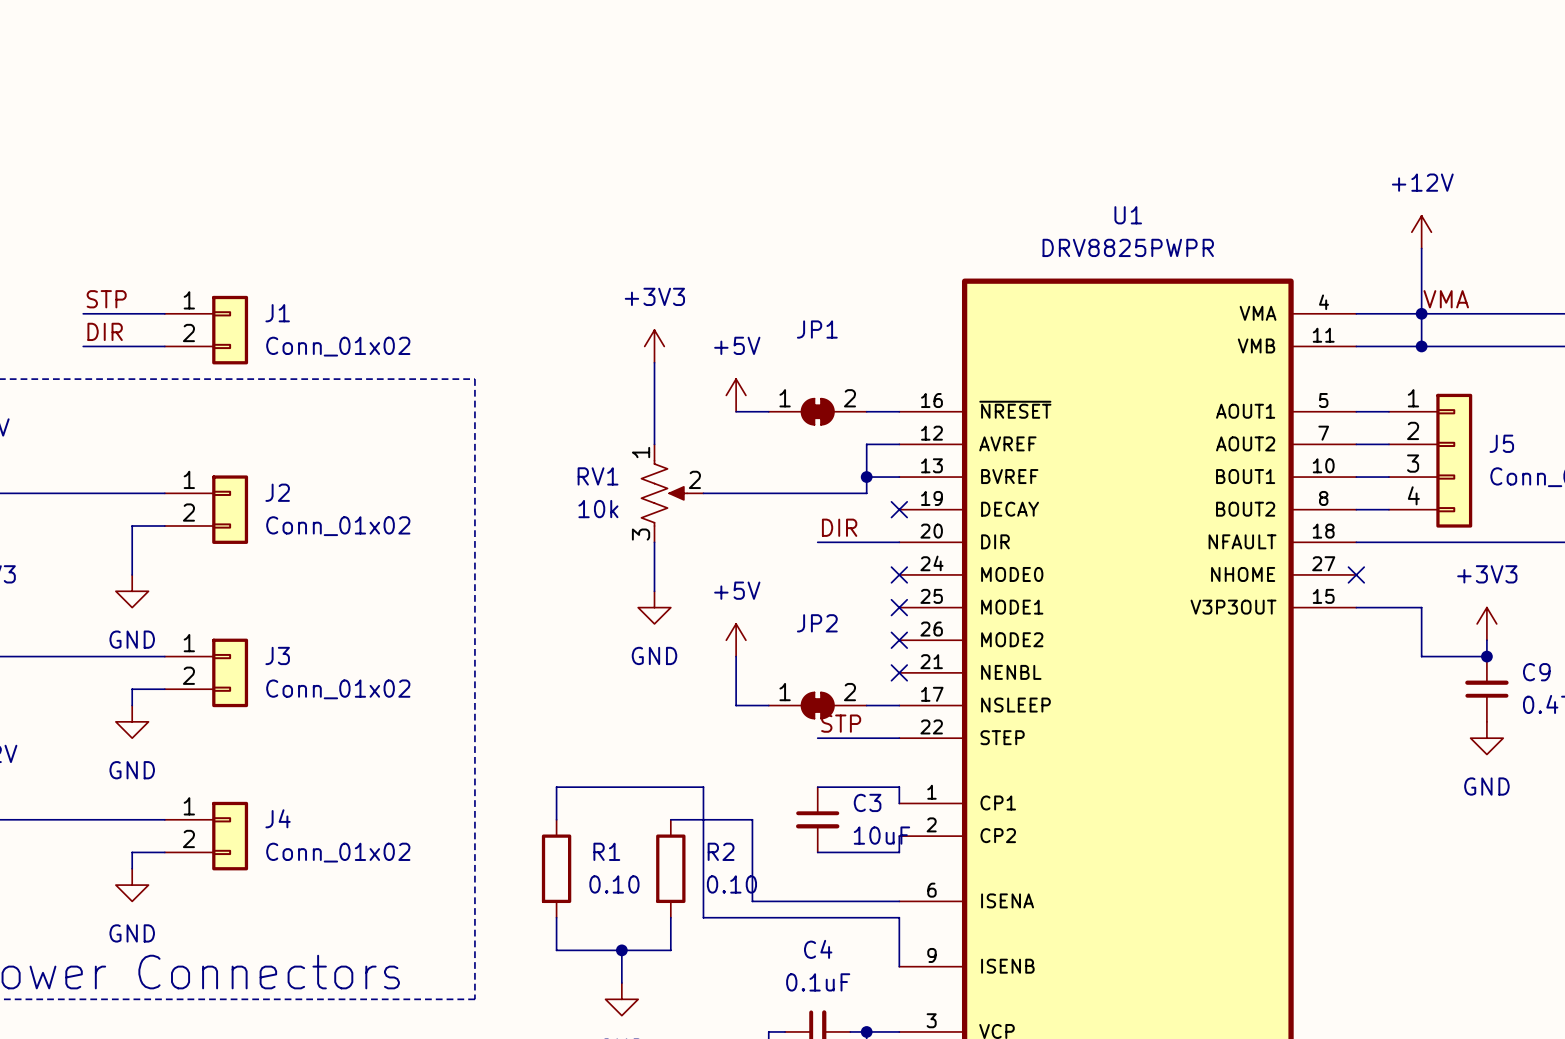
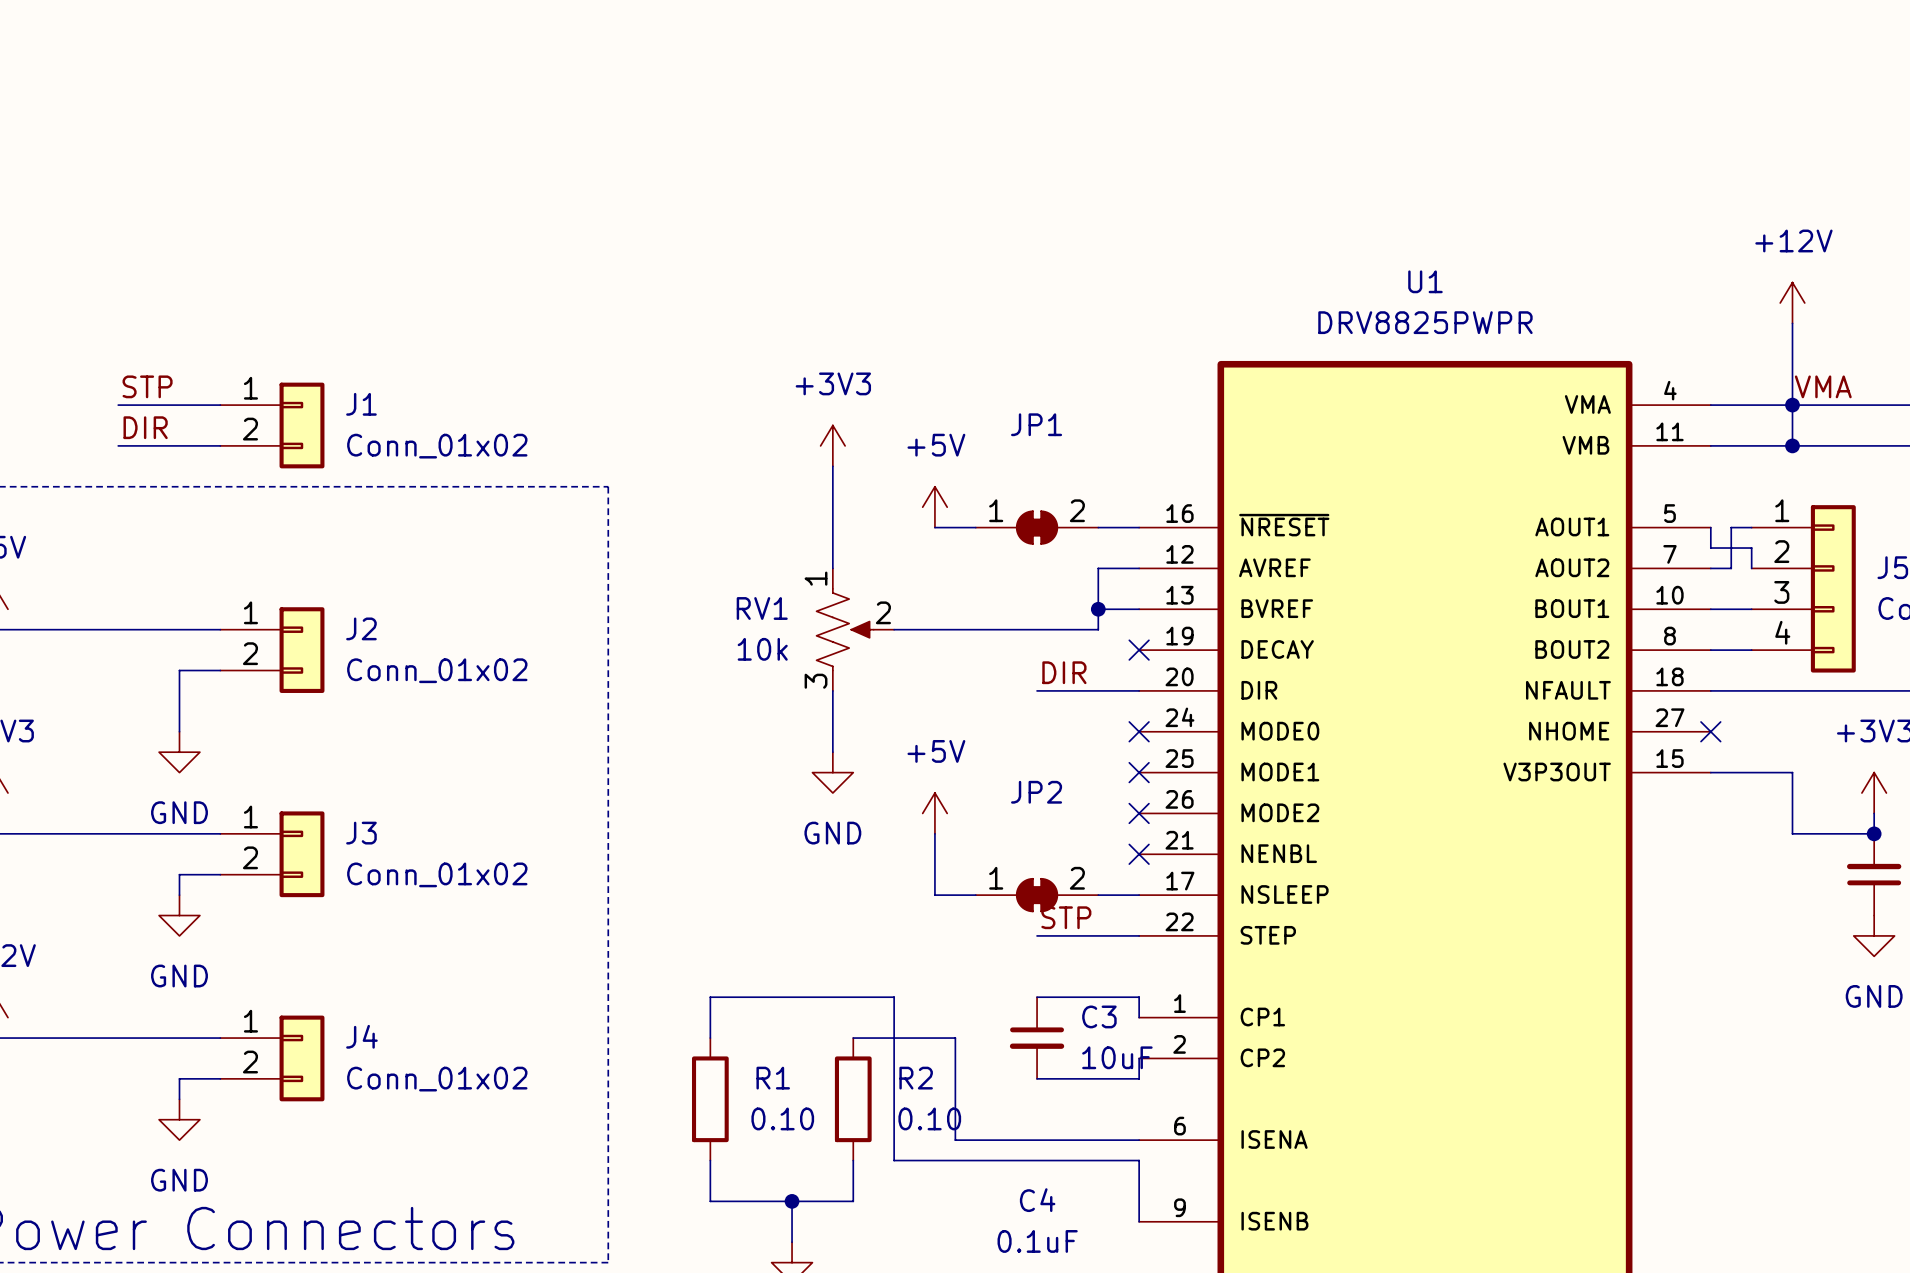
wire: (1356, 411) (1372, 411) -> (1710, 527) (1710, 548) (1751, 548) (1751, 568)
wire: (1372, 444) (1388, 444) -> (1731, 568) (1731, 527)

